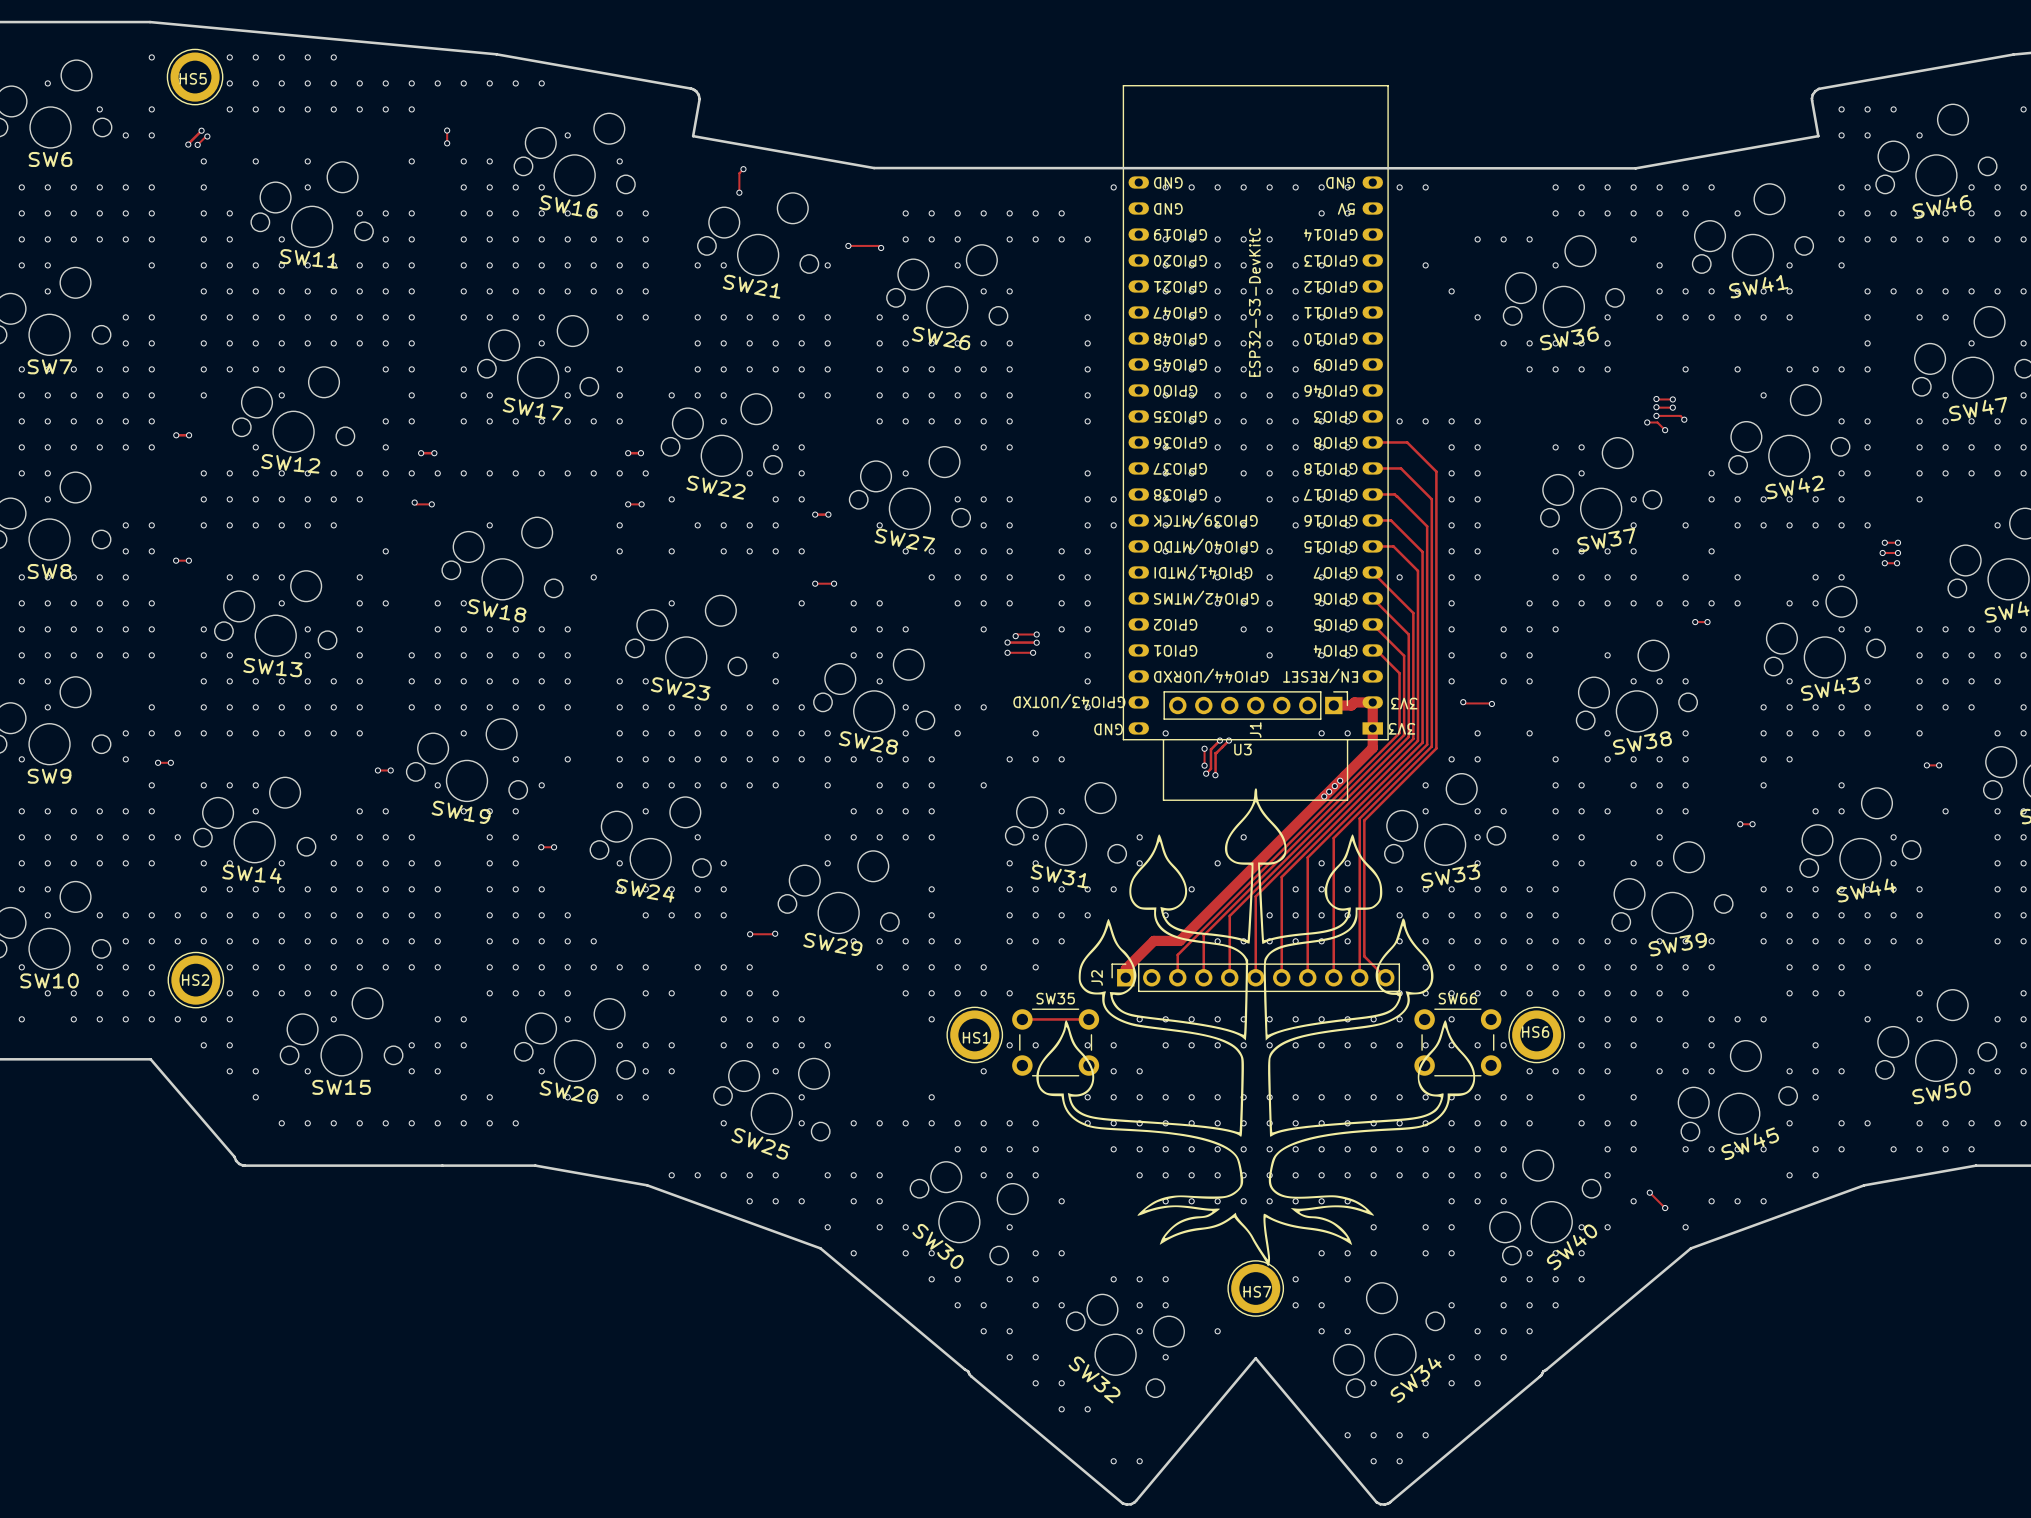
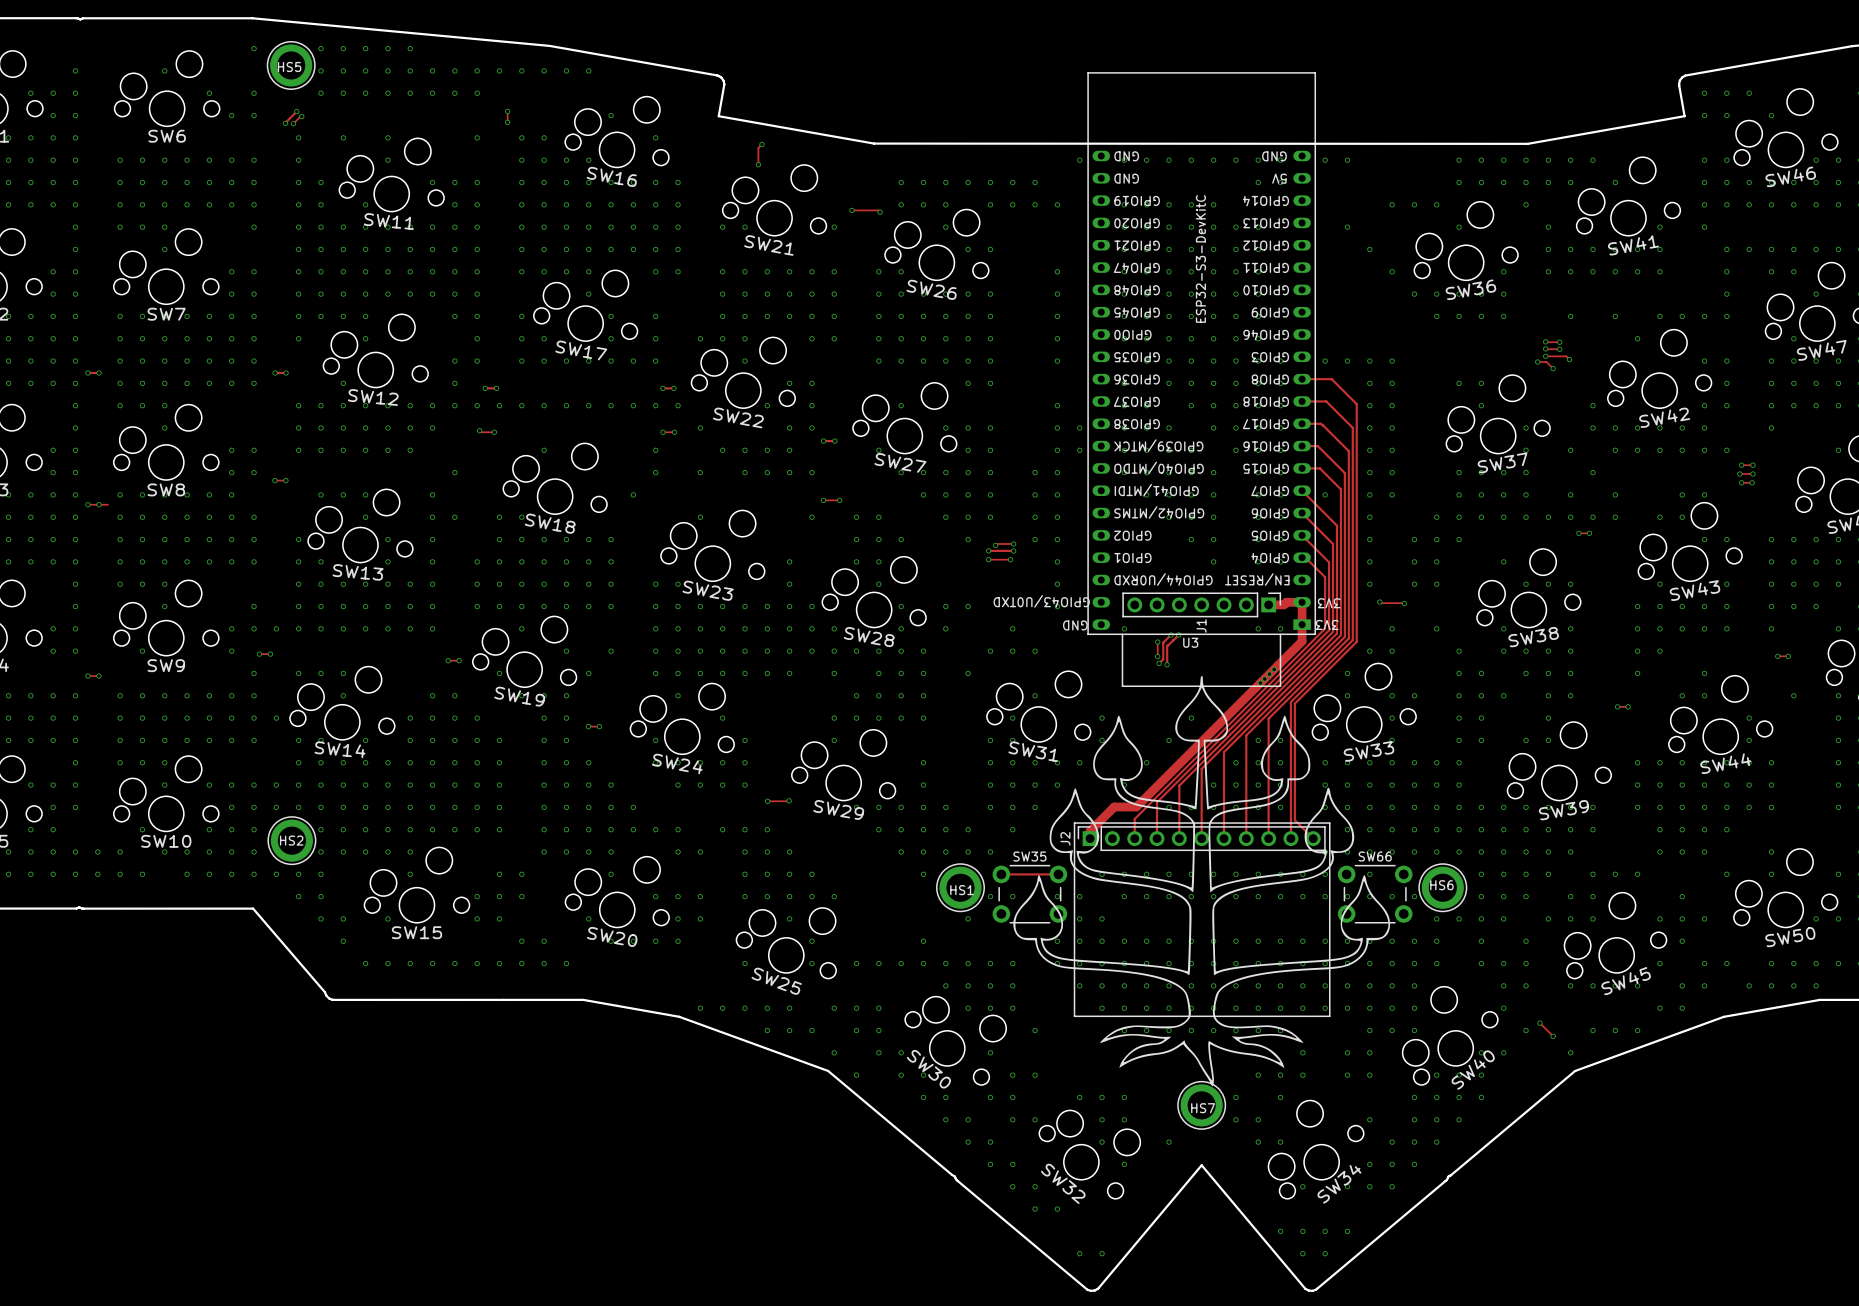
line: none -> (1074, 823) (1329, 823) (1329, 1016) (1074, 1016) (1074, 823)

